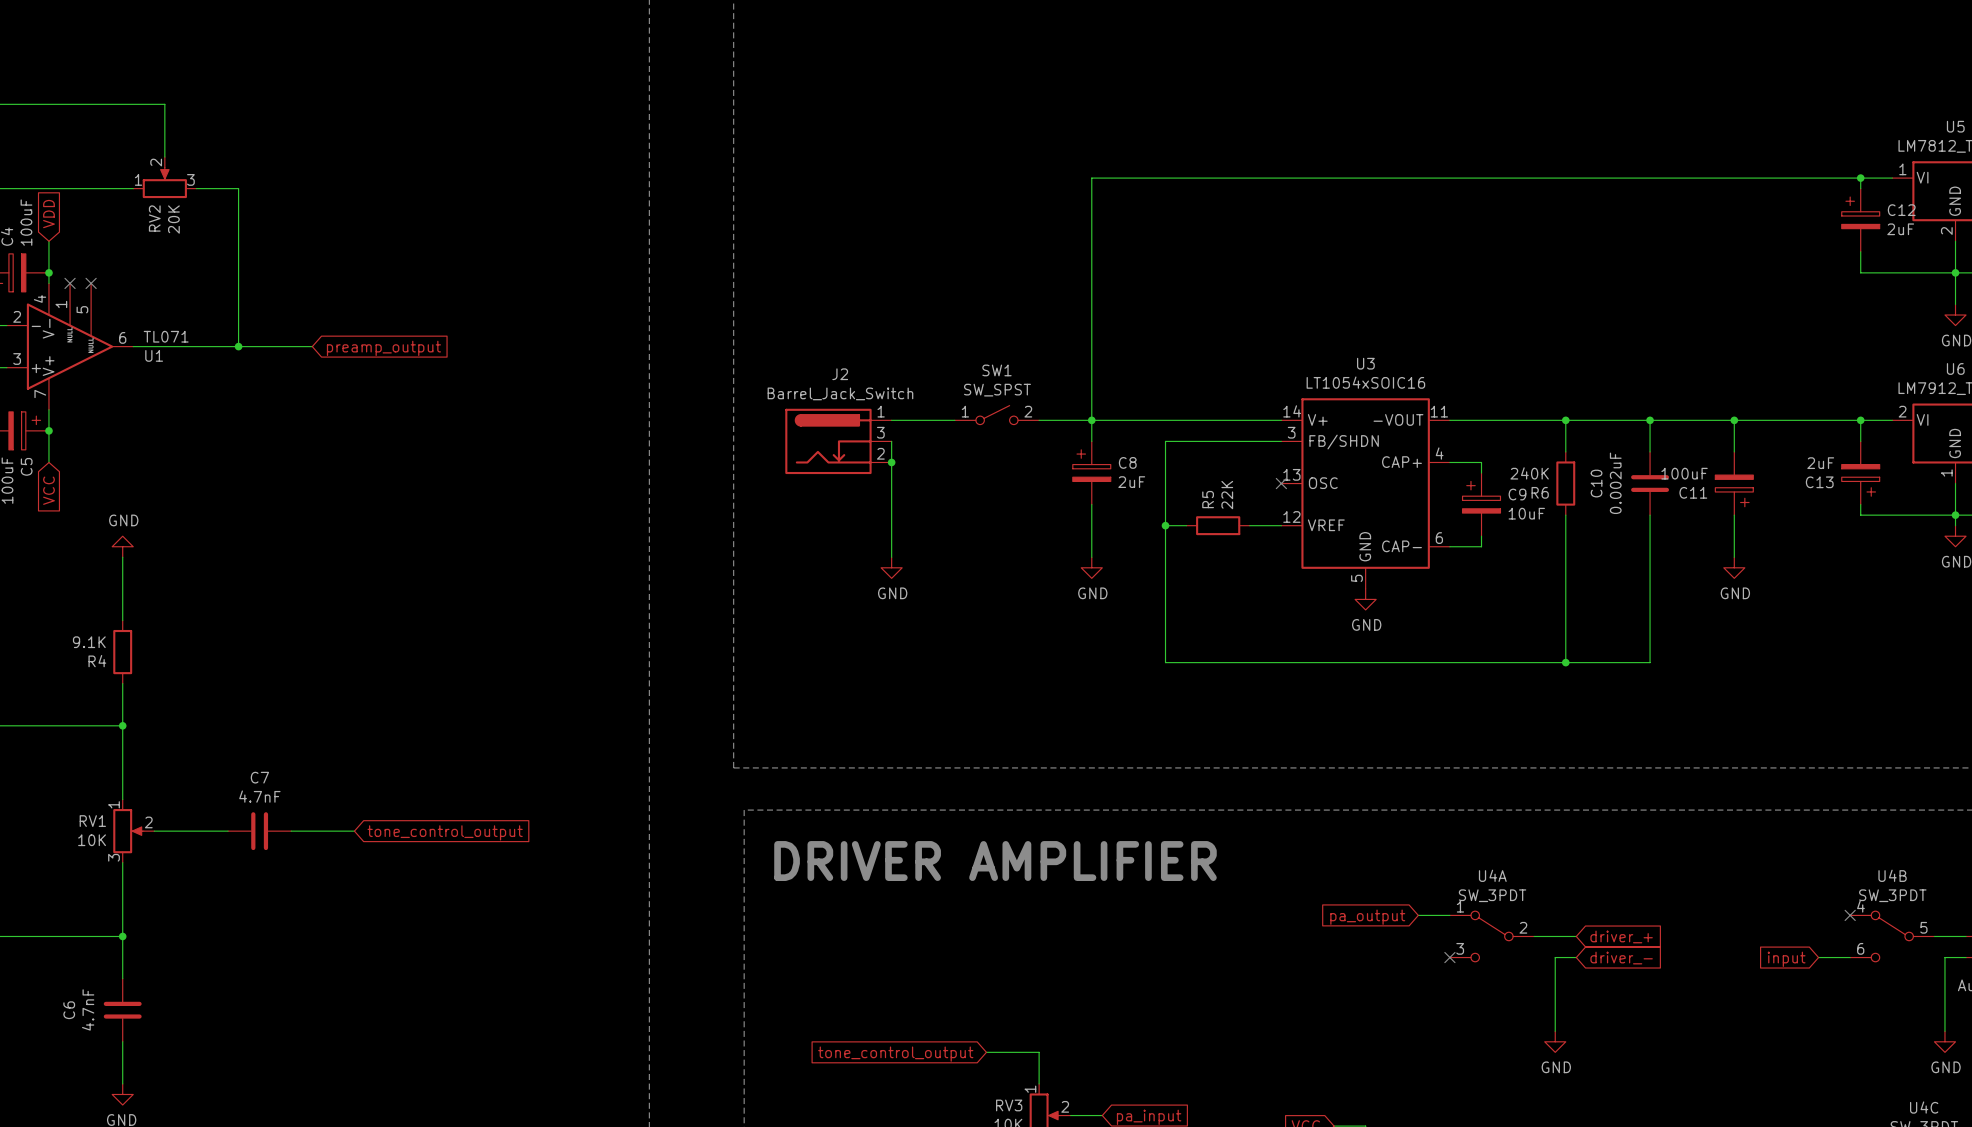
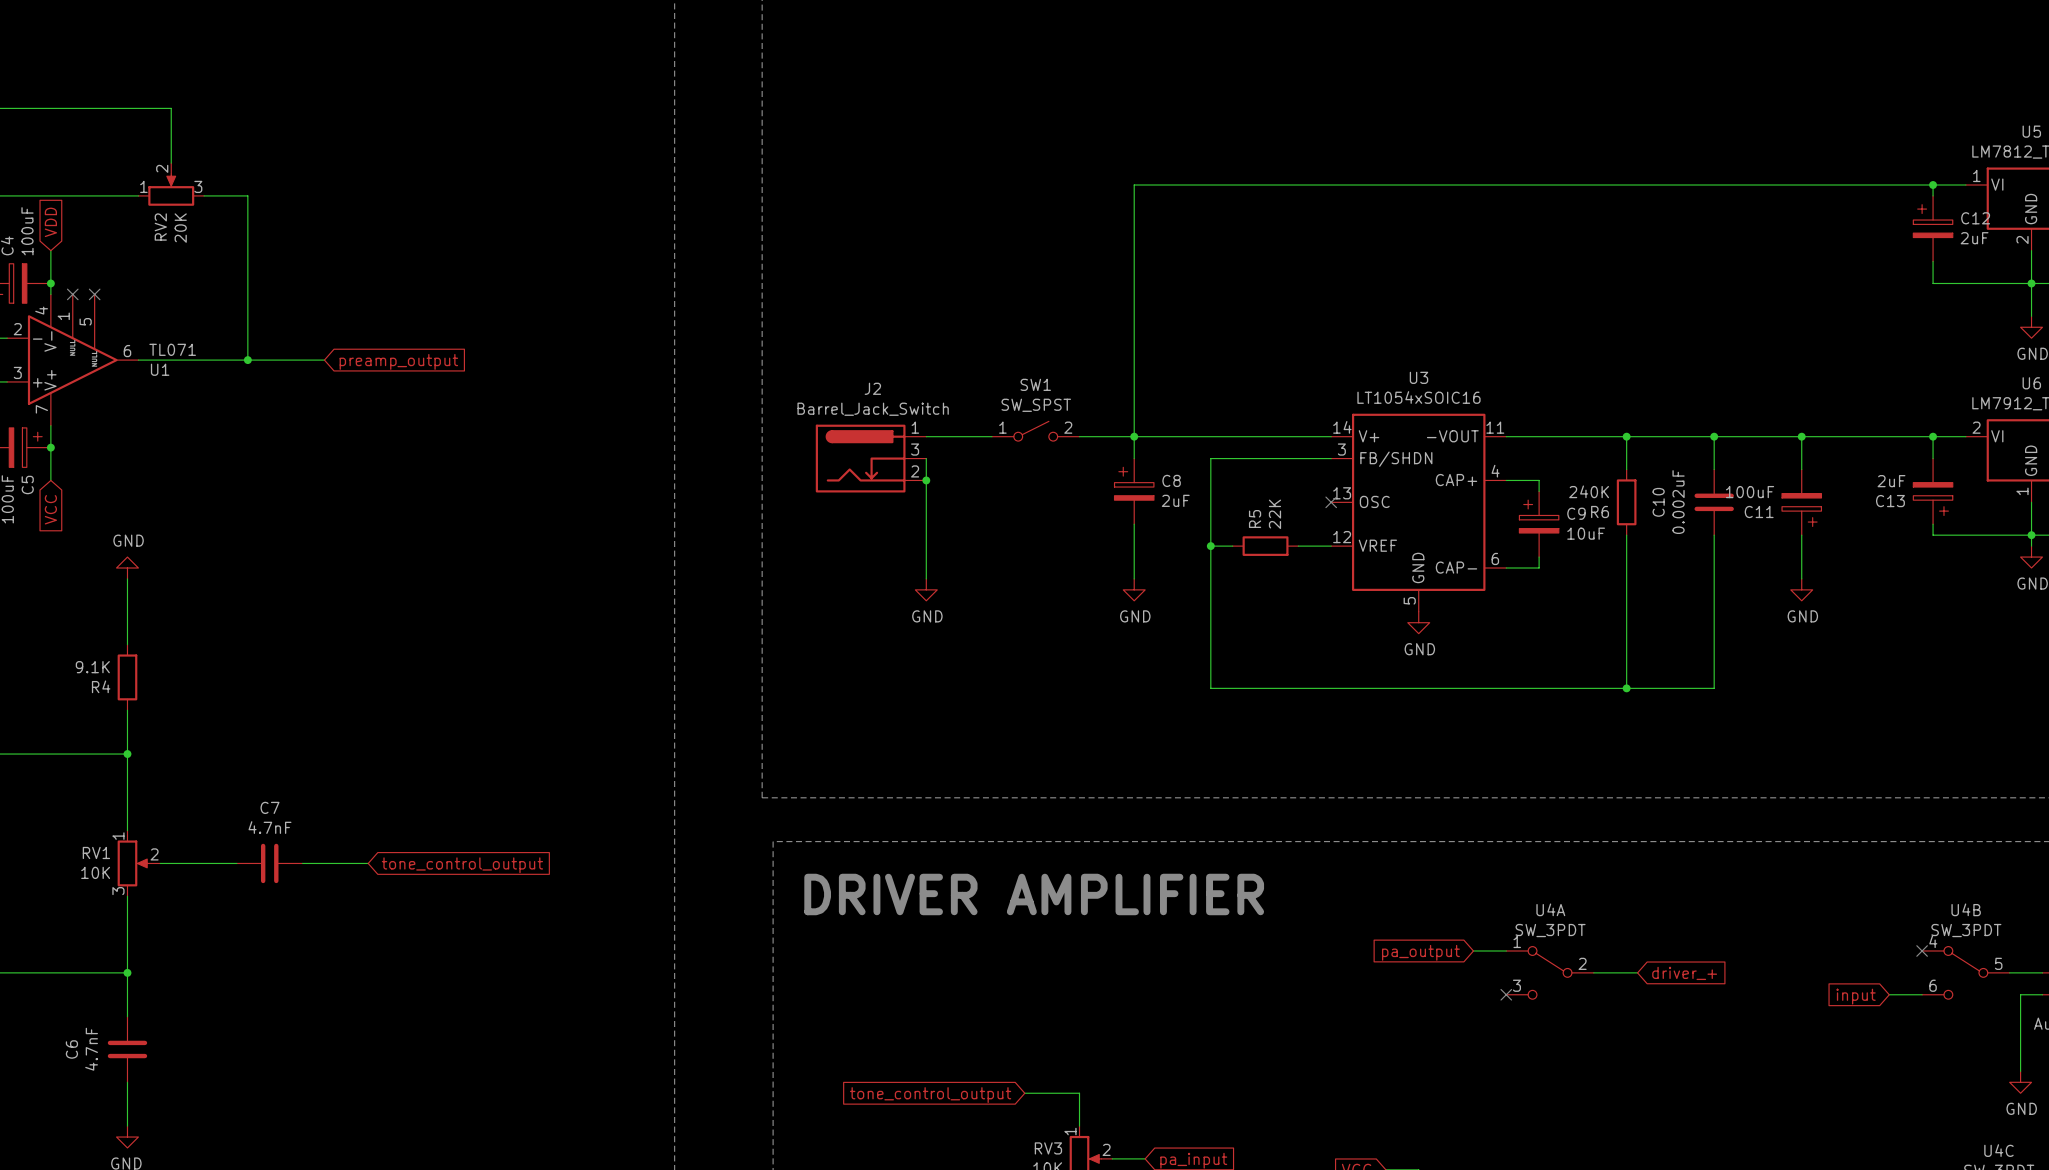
wire: (1576, 957) (1555, 957) (1555, 1031) -> none
global label: driver_- (1621, 958) -> none
power symbol: GND (1555, 1041) -> none

